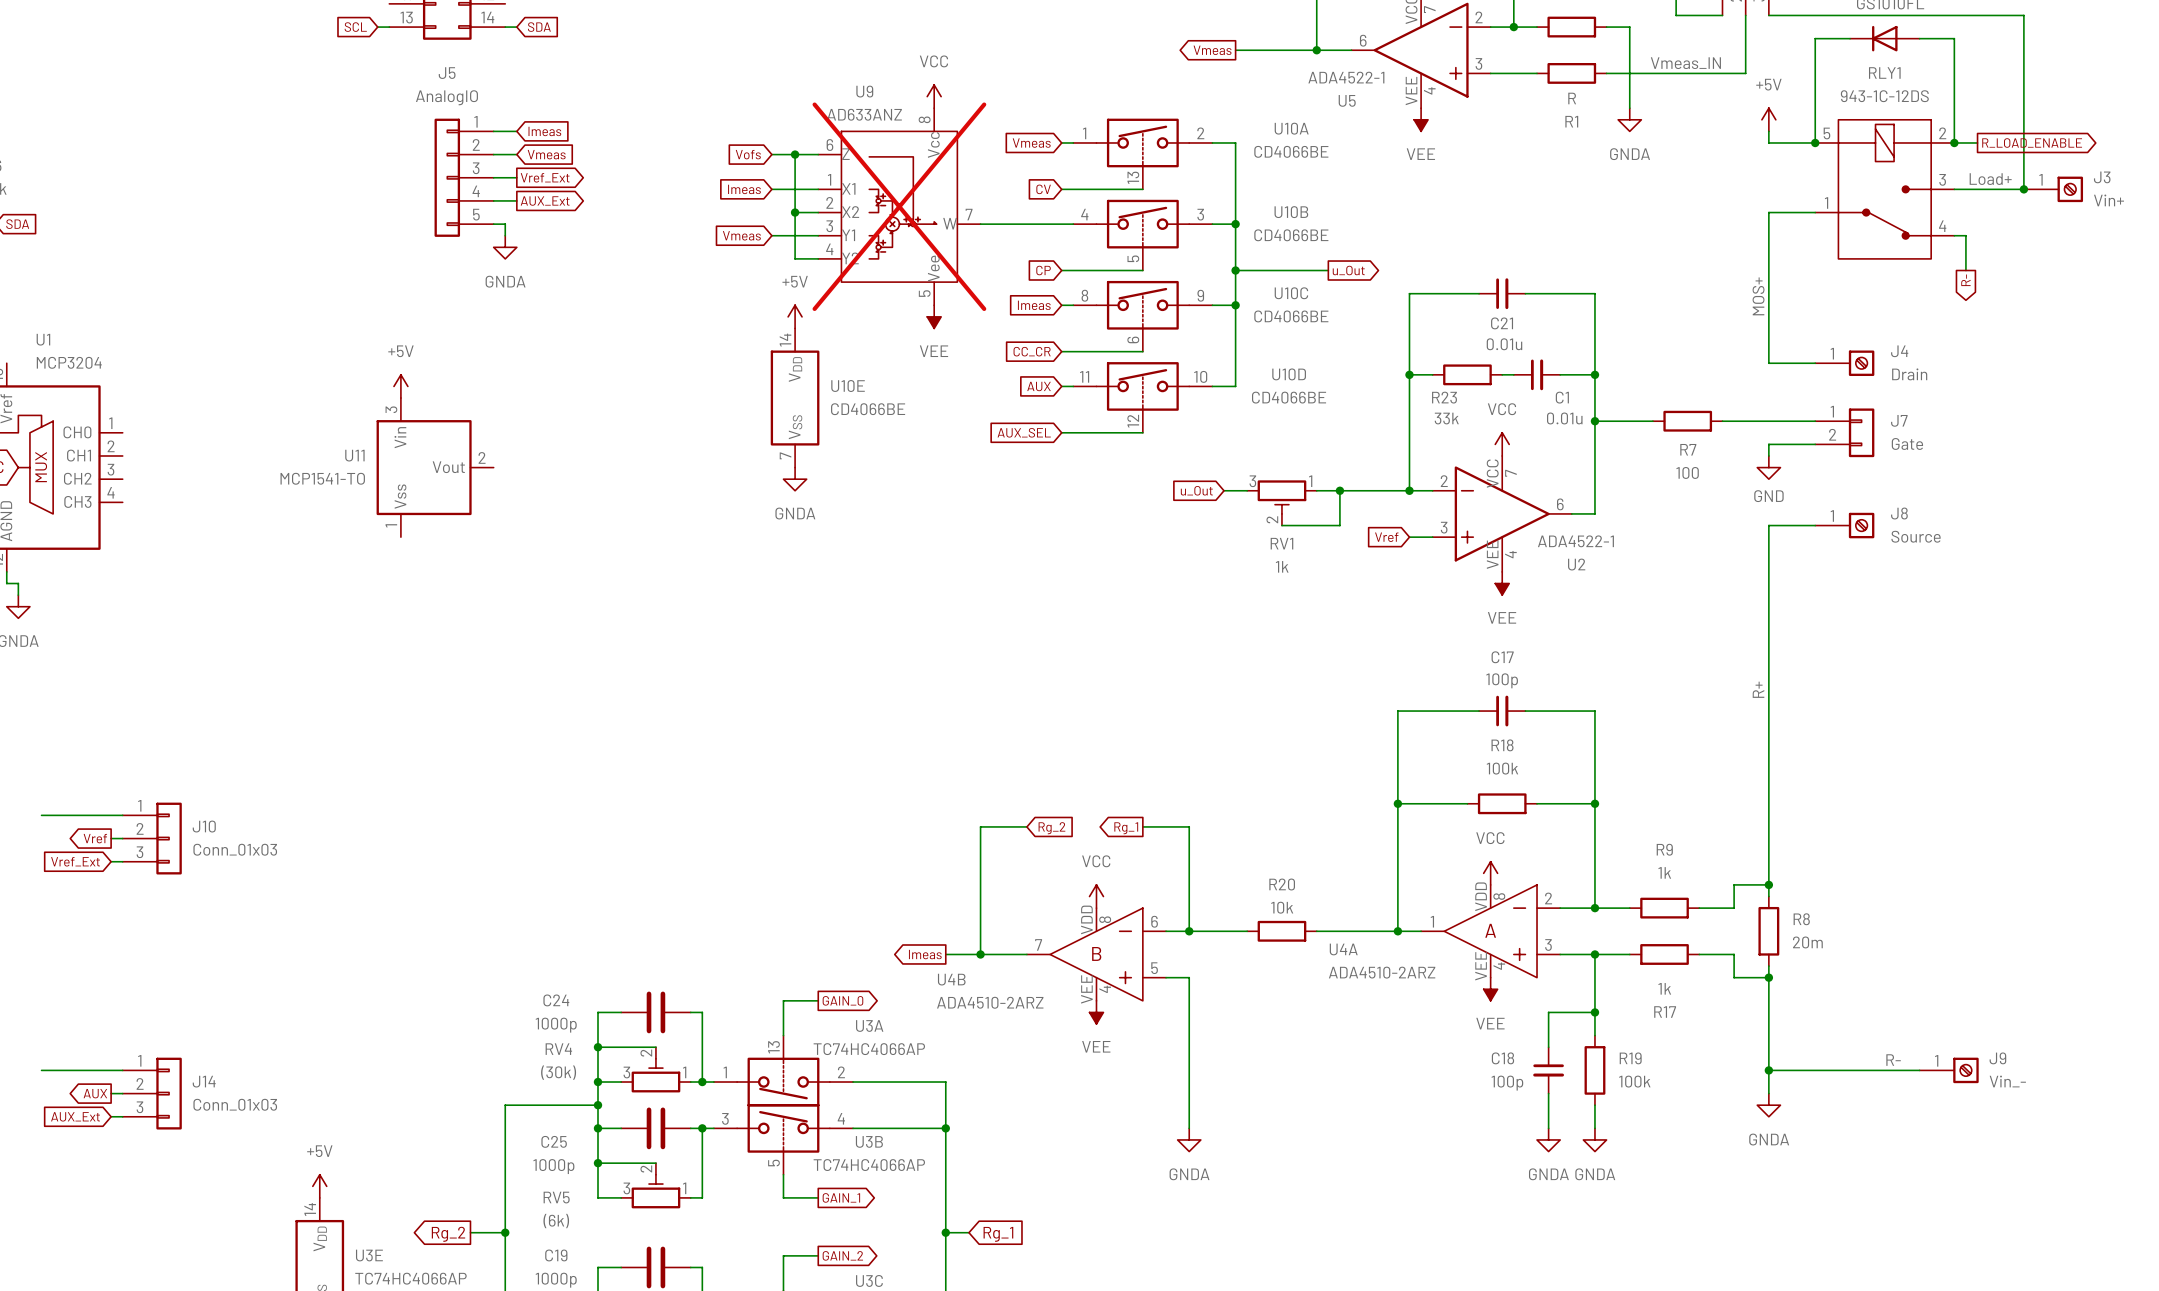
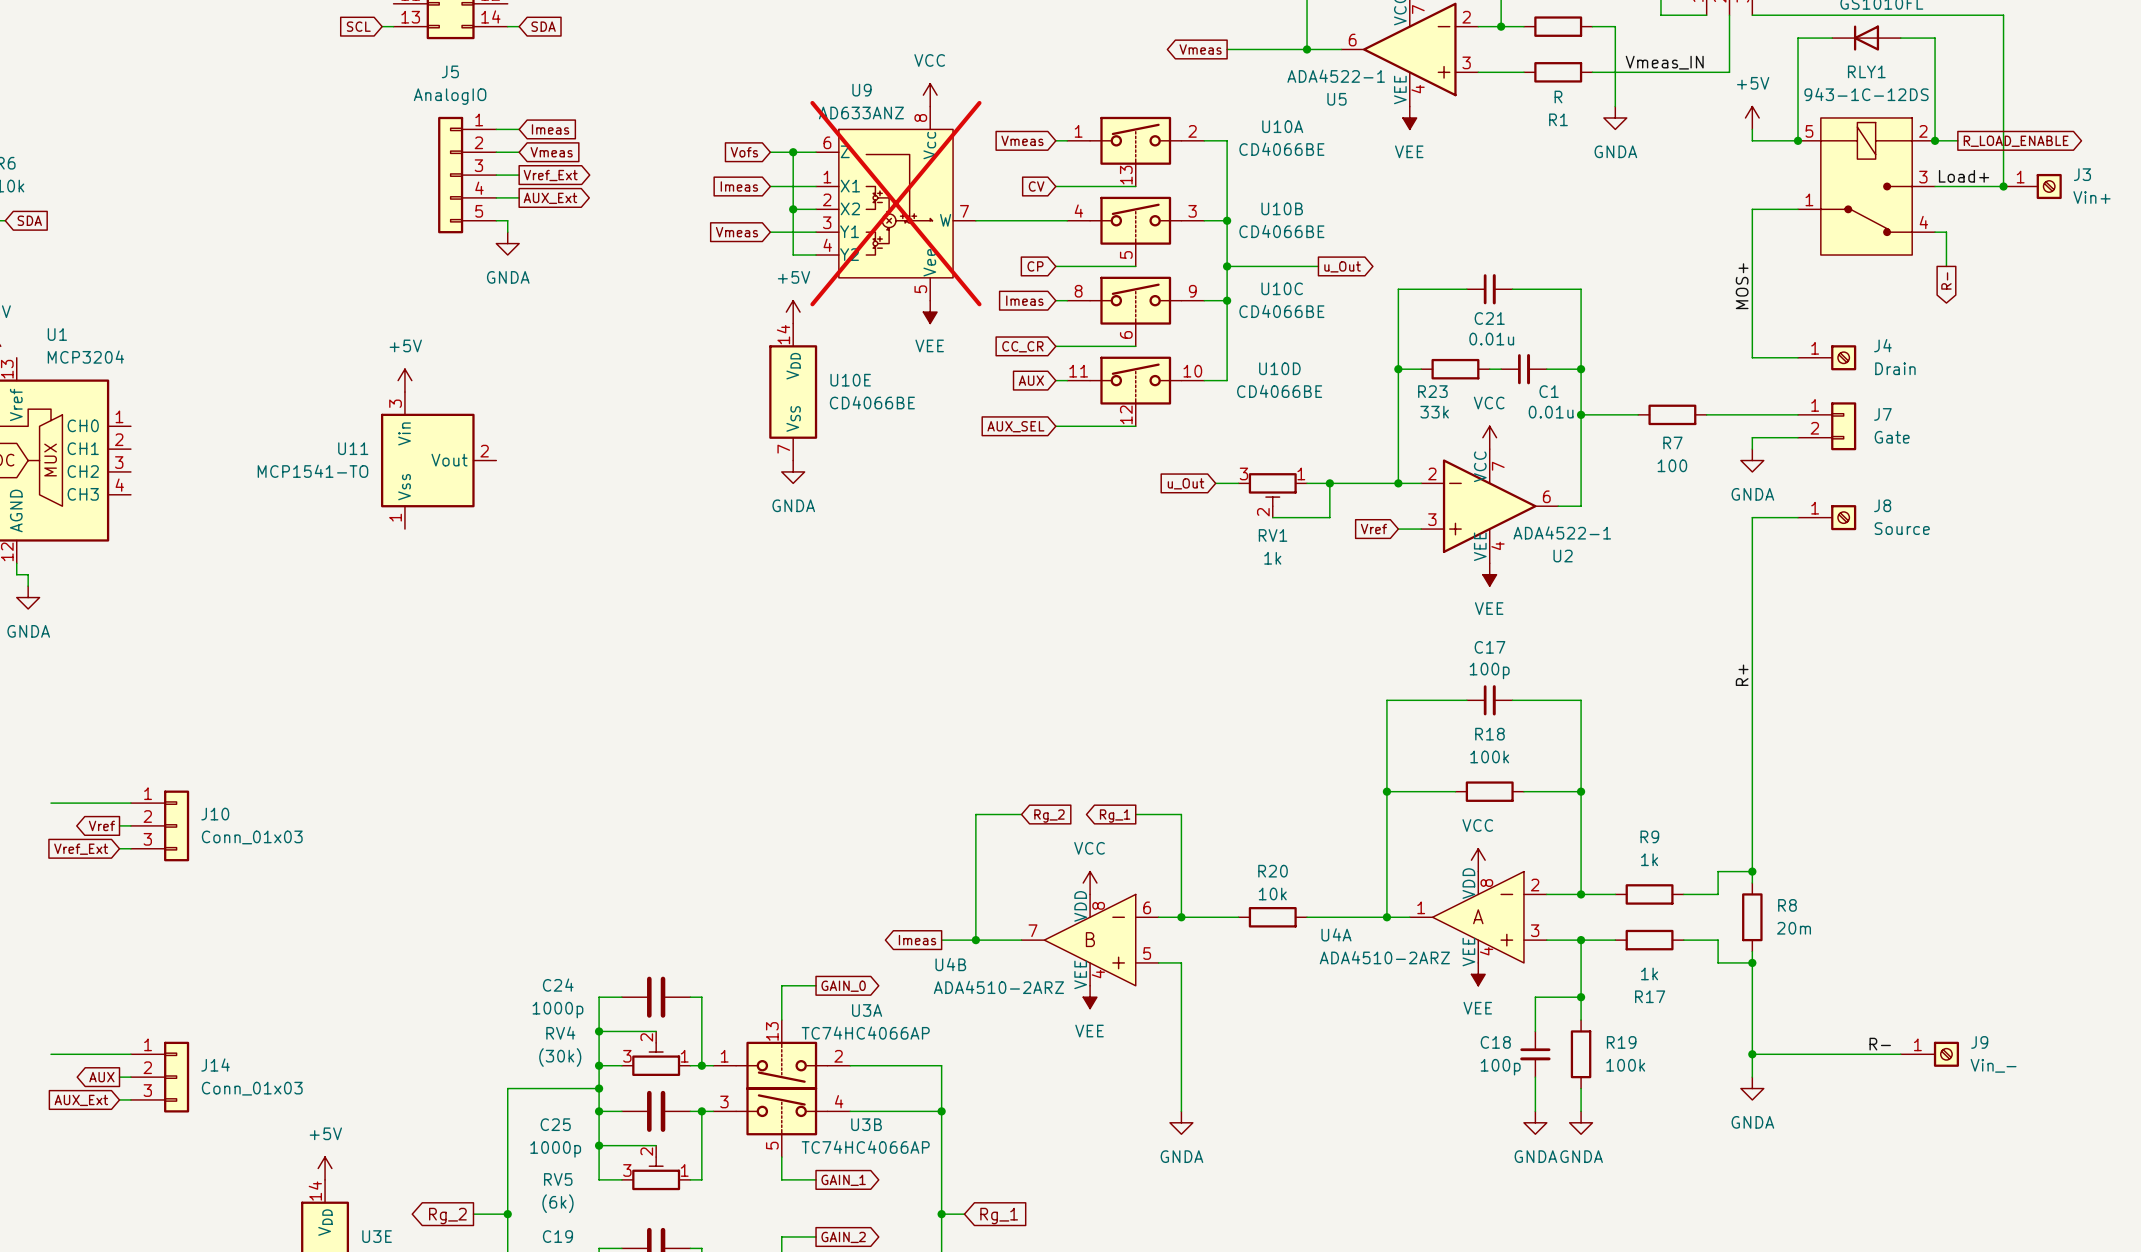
power symbol: GND (1768, 467) -> GNDA (1752, 460)

